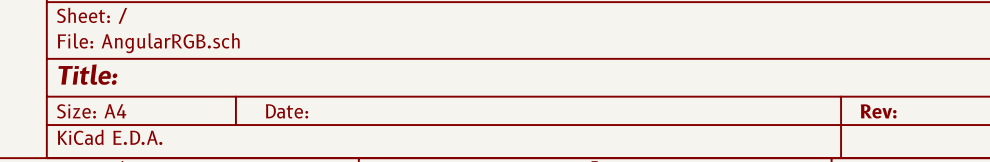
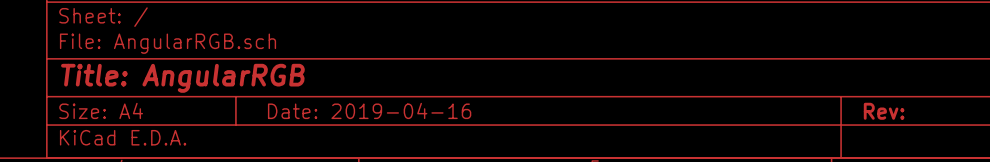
title block: Title: (87, 74) -> Title: AngularRGB (182, 78)
title block: Date: (287, 111) -> Date: 2019-04-16 (369, 110)

